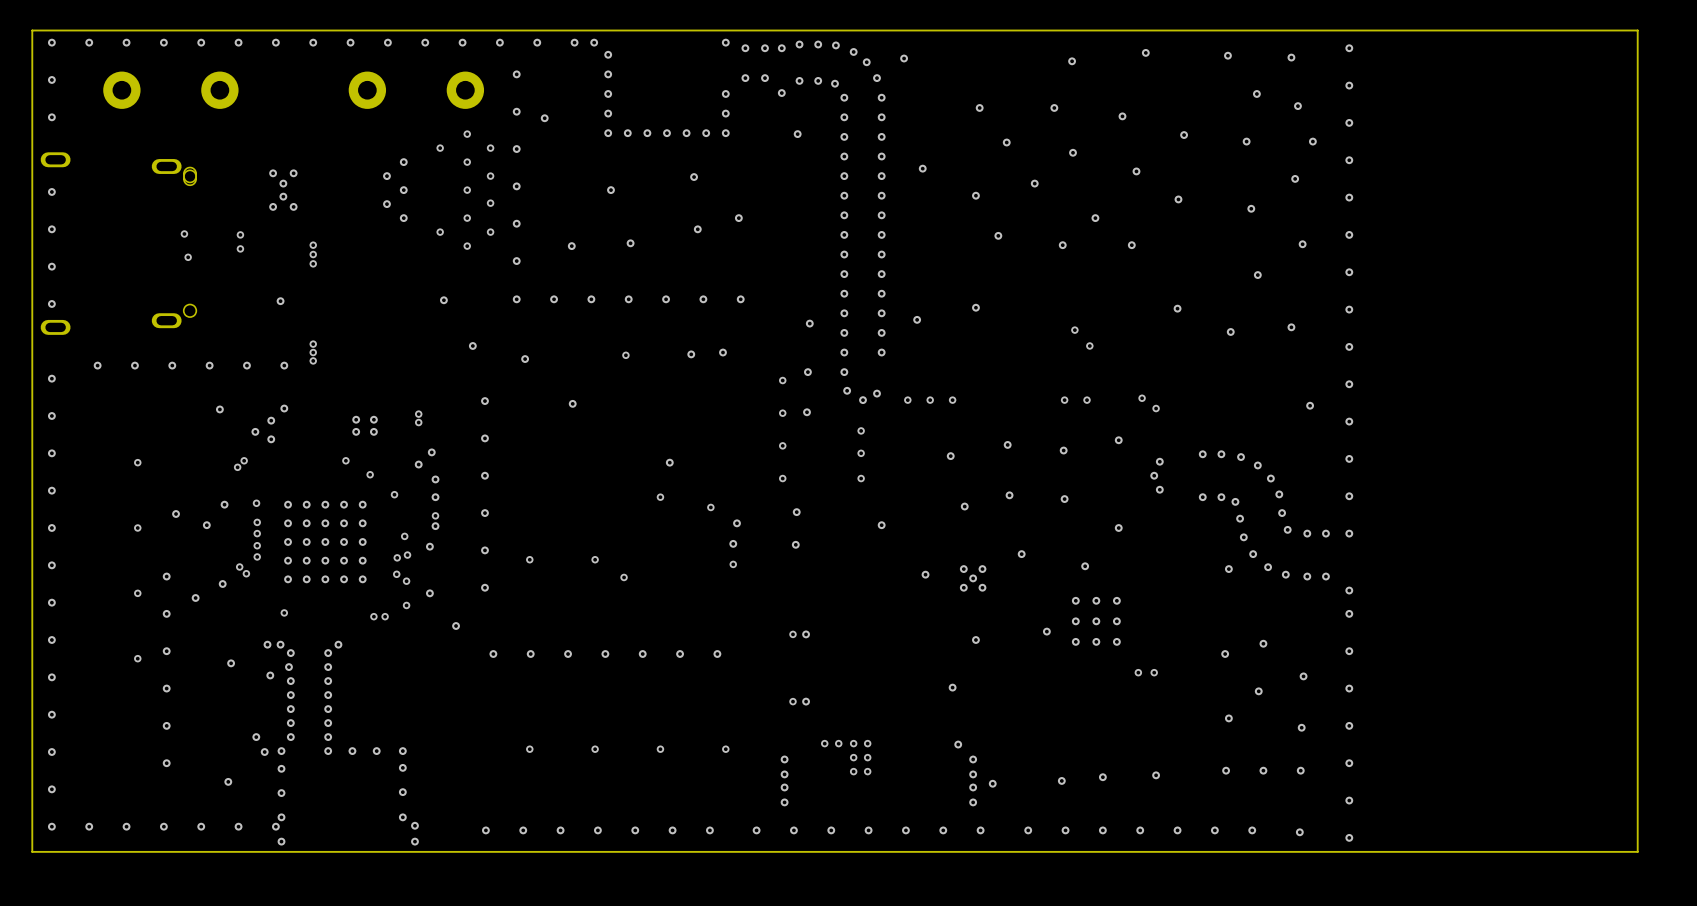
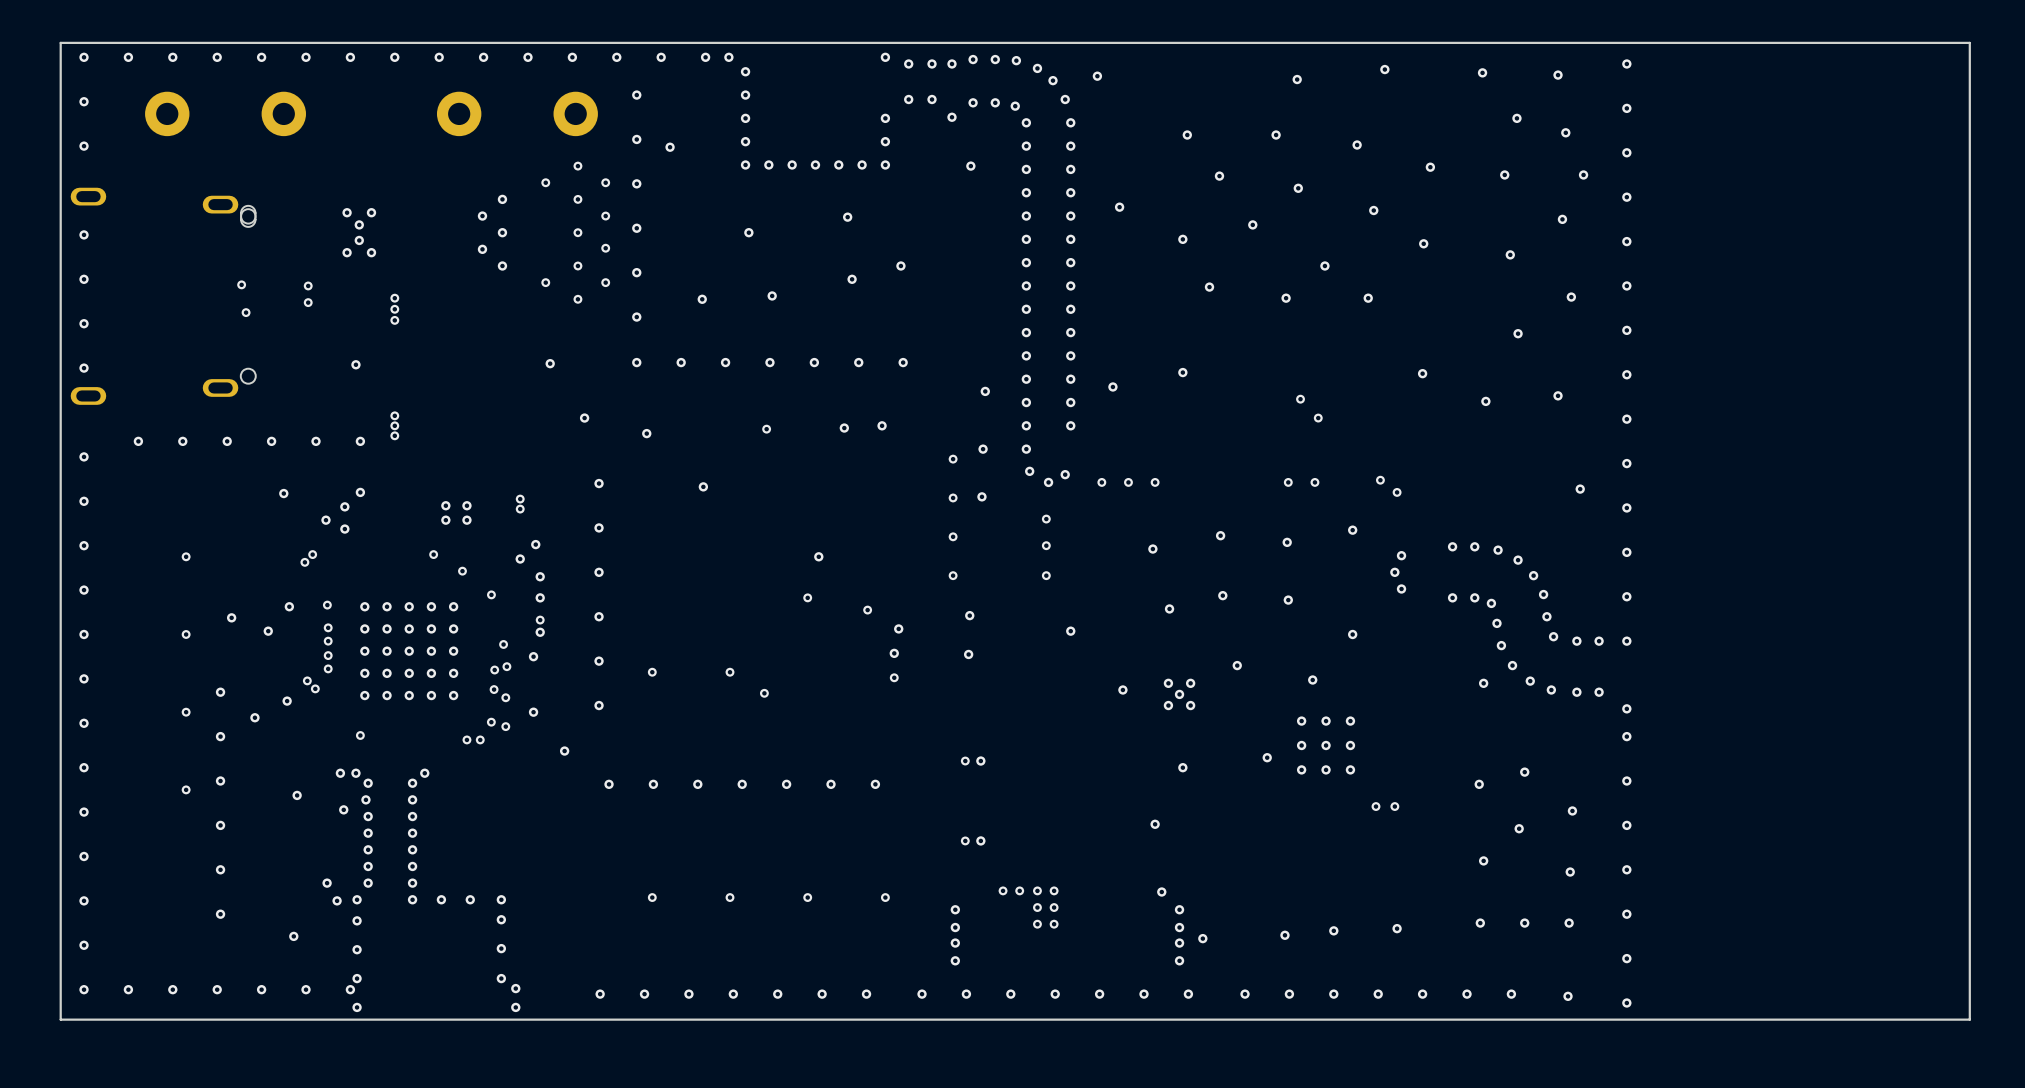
via: none -> (491, 722)

